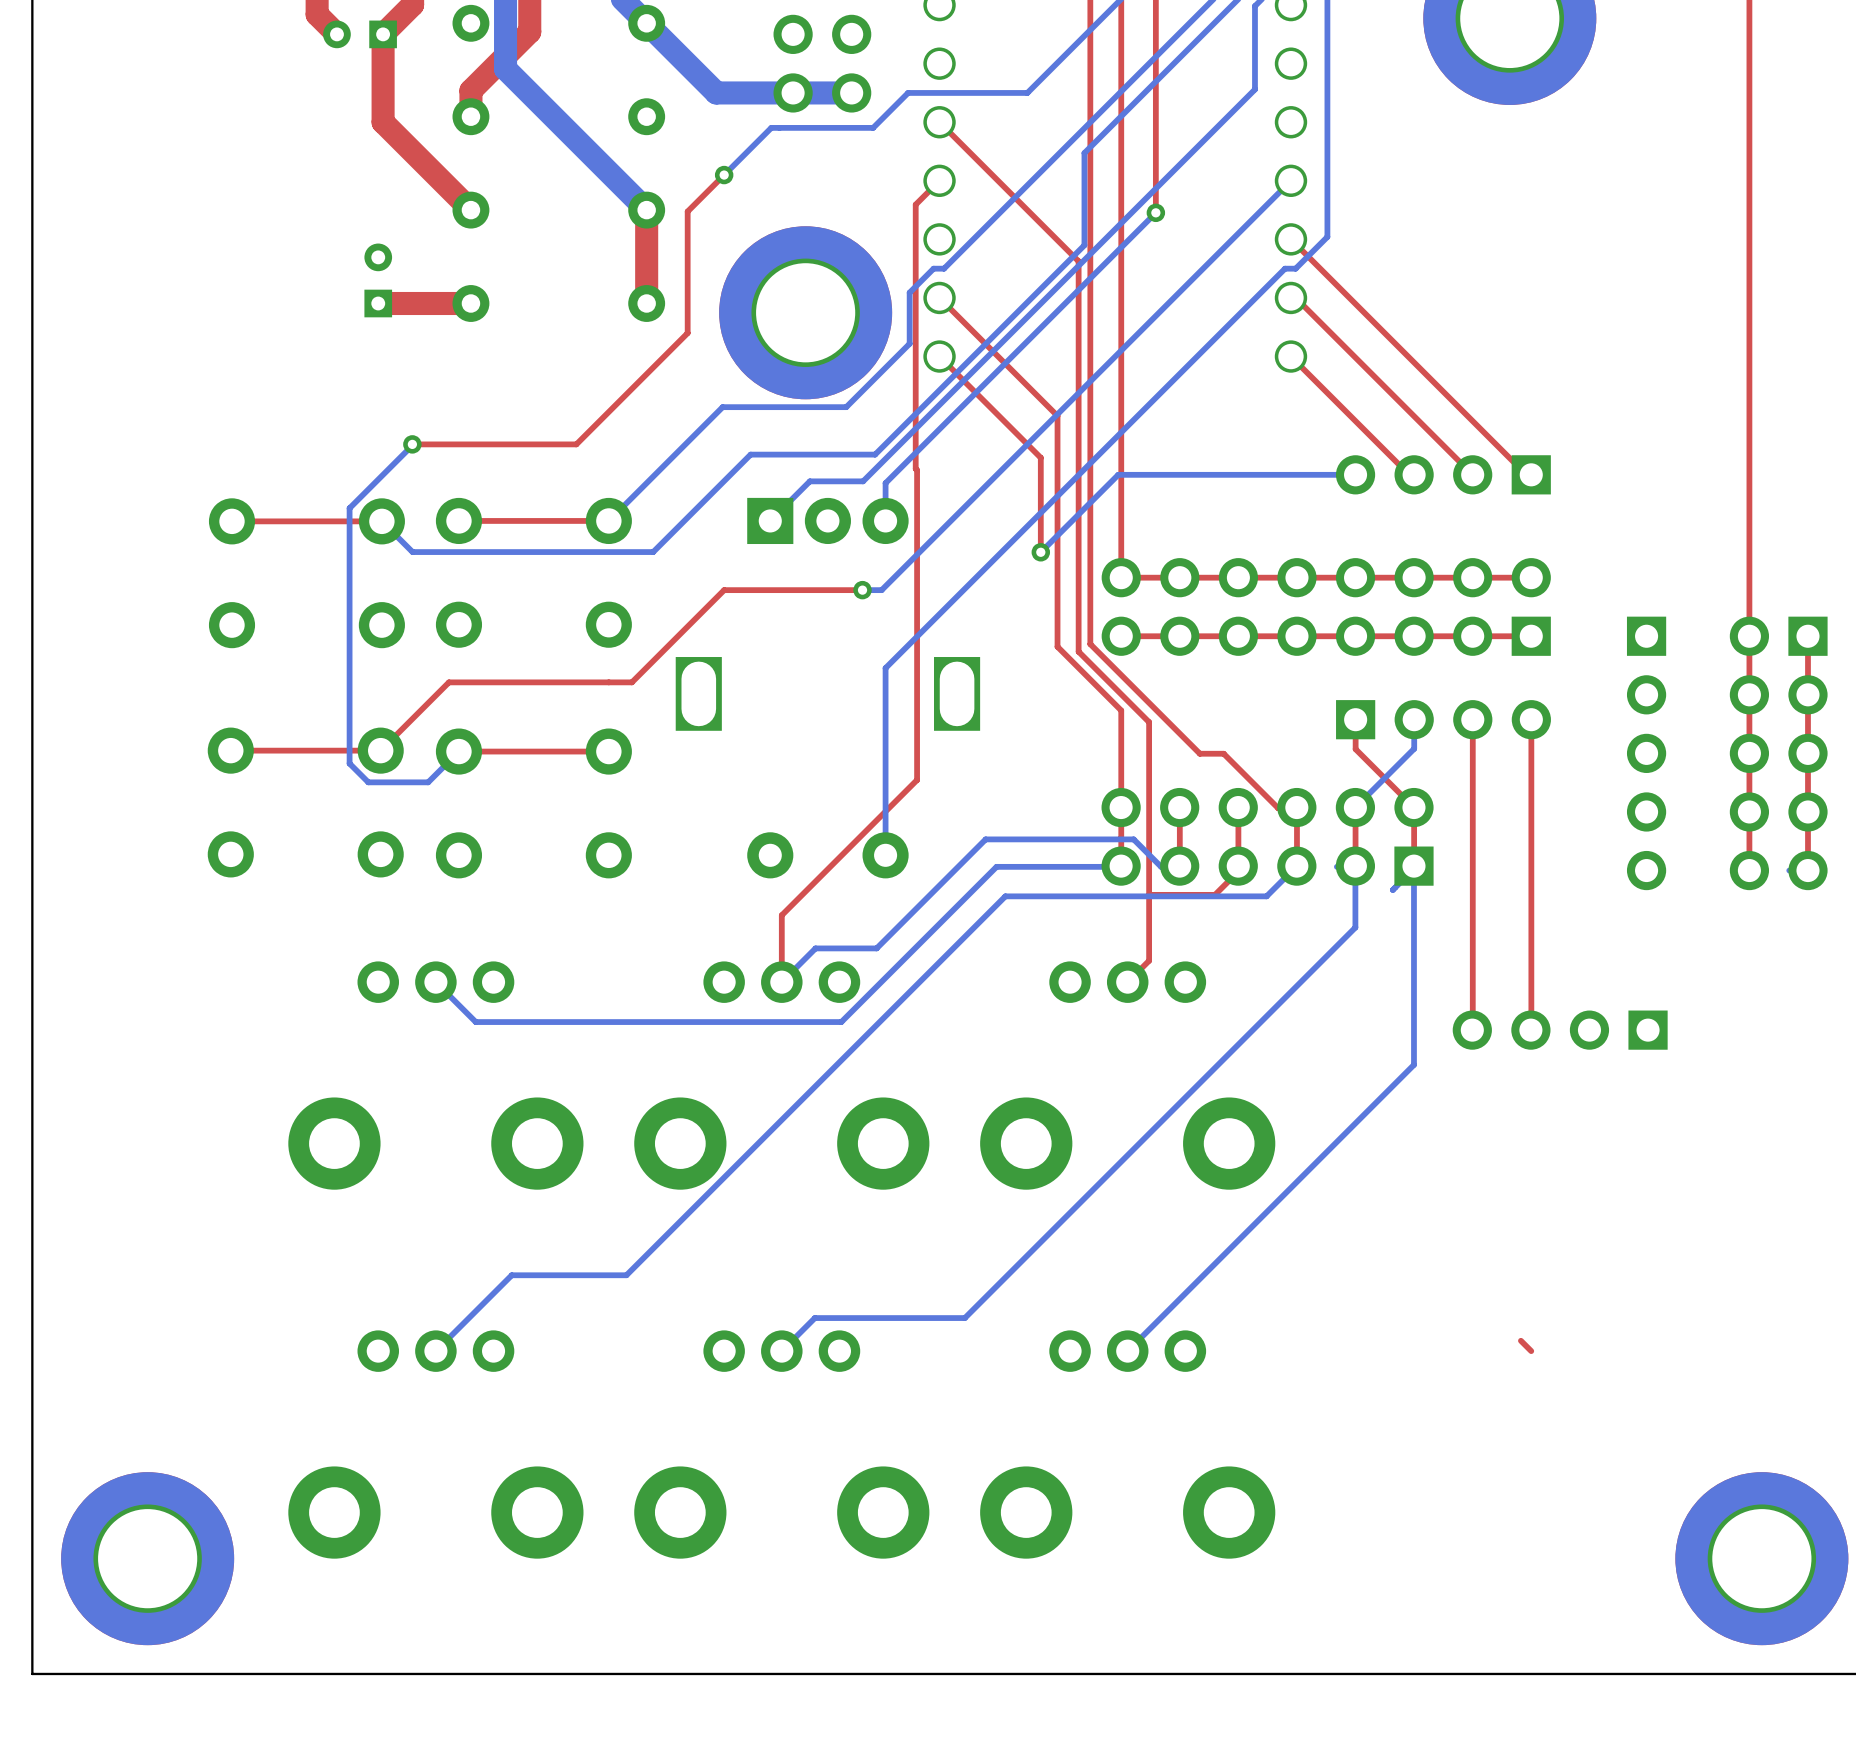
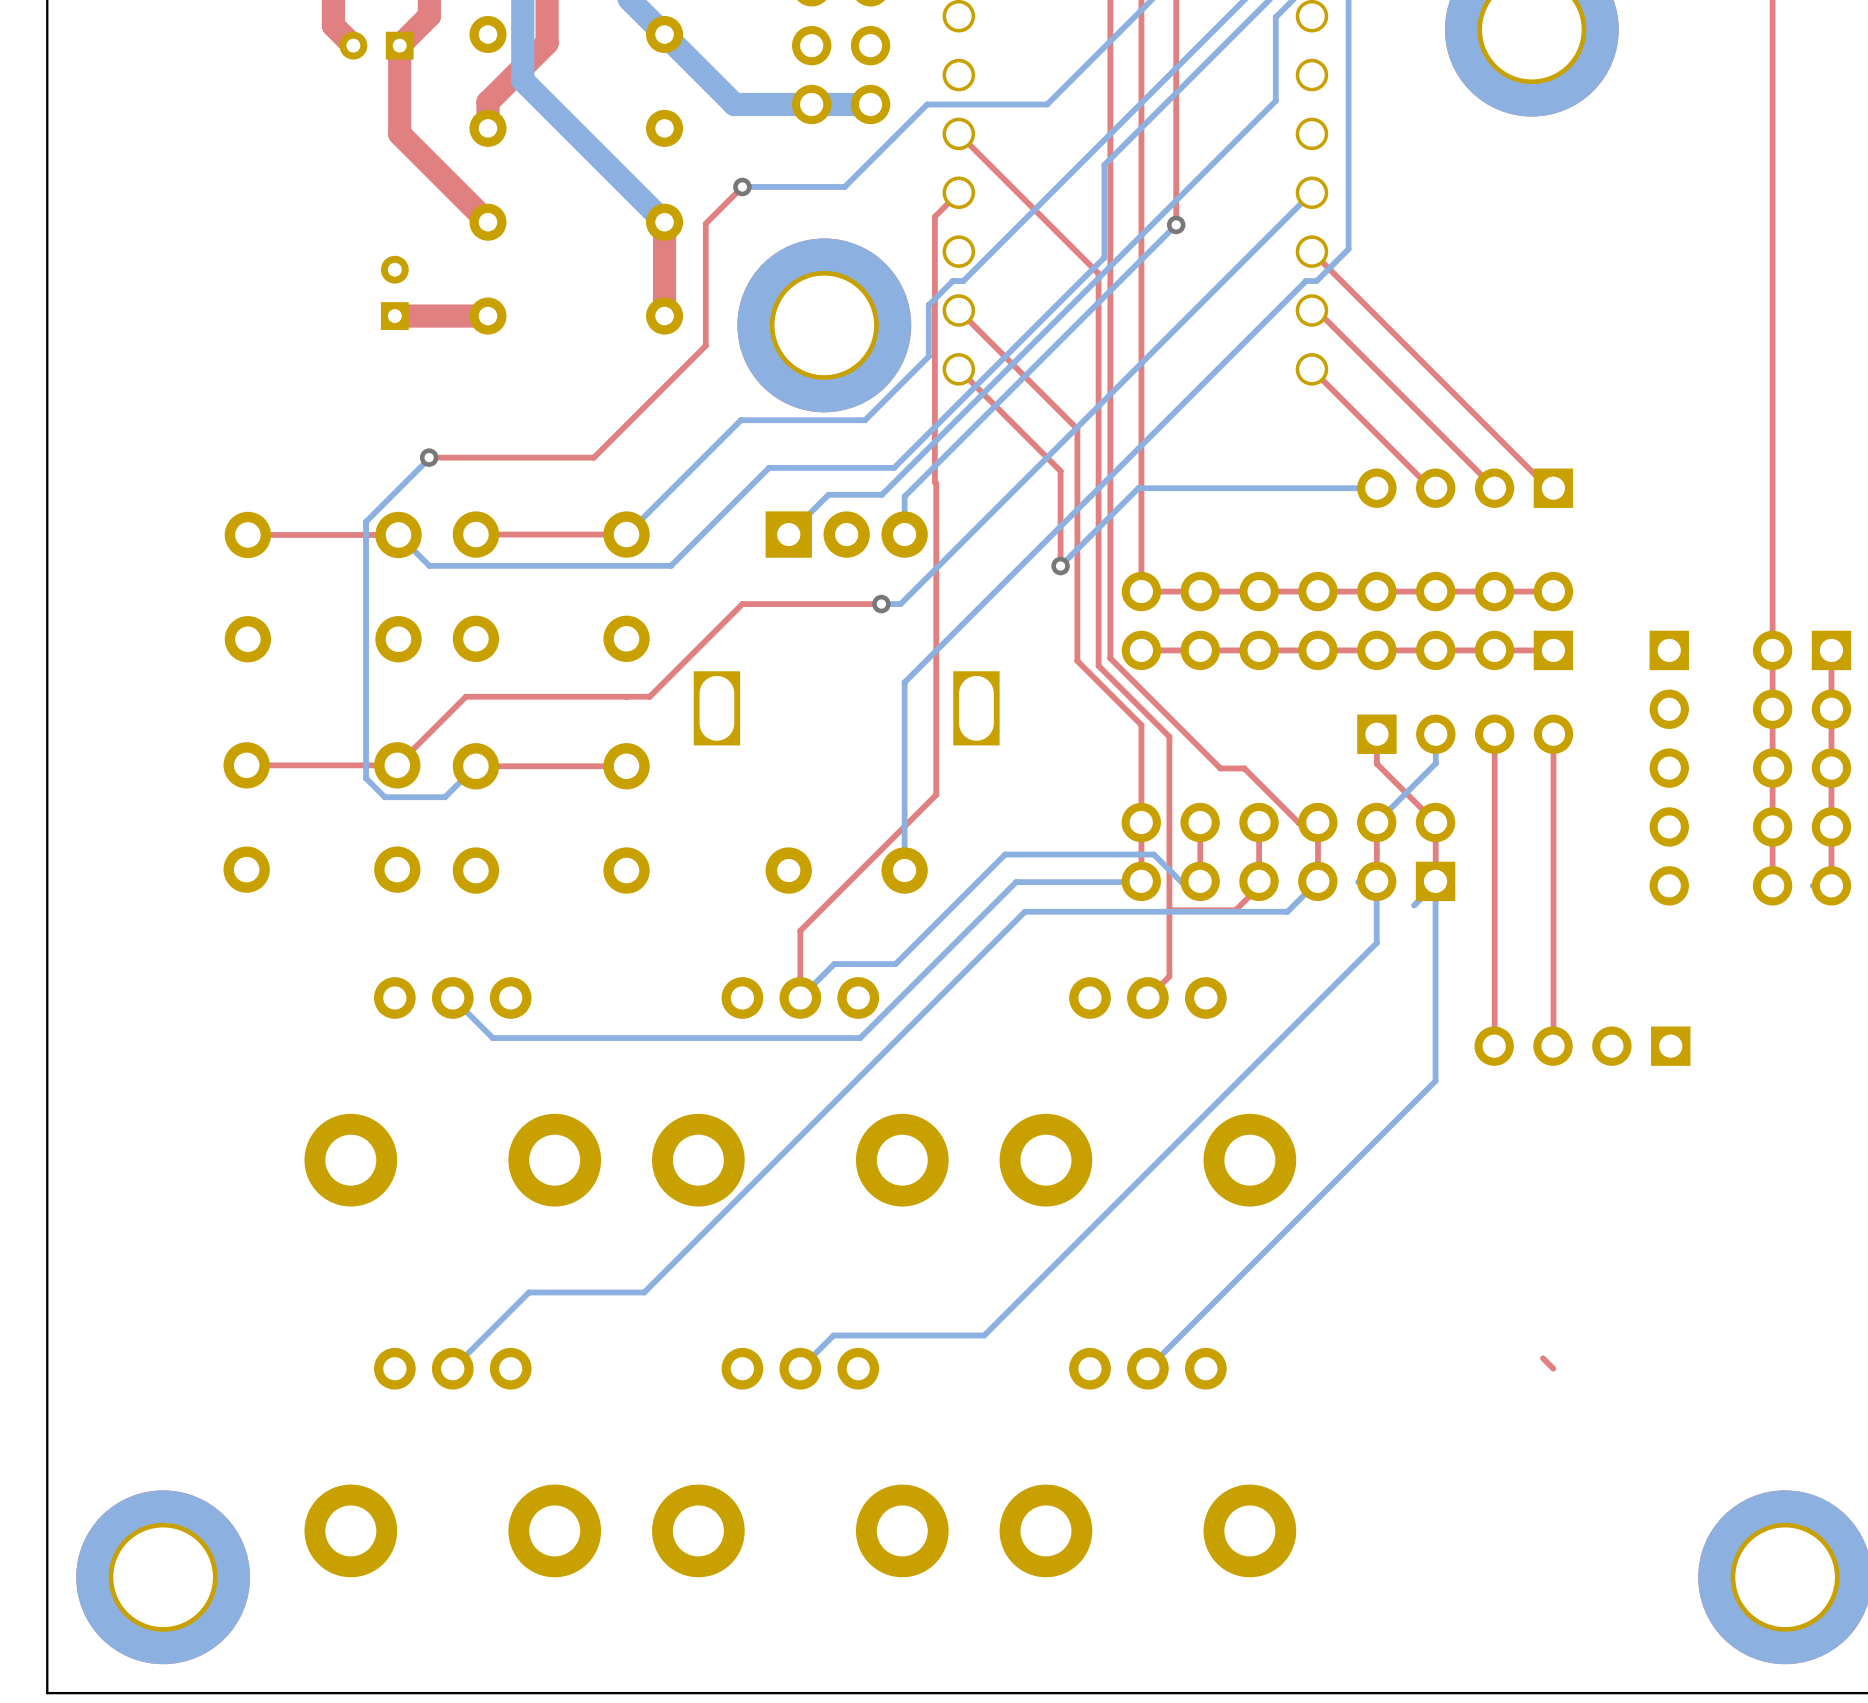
bottom track: (873, 127) (771, 127) (724, 175) -> (892, 139) (844, 186) (742, 186)

